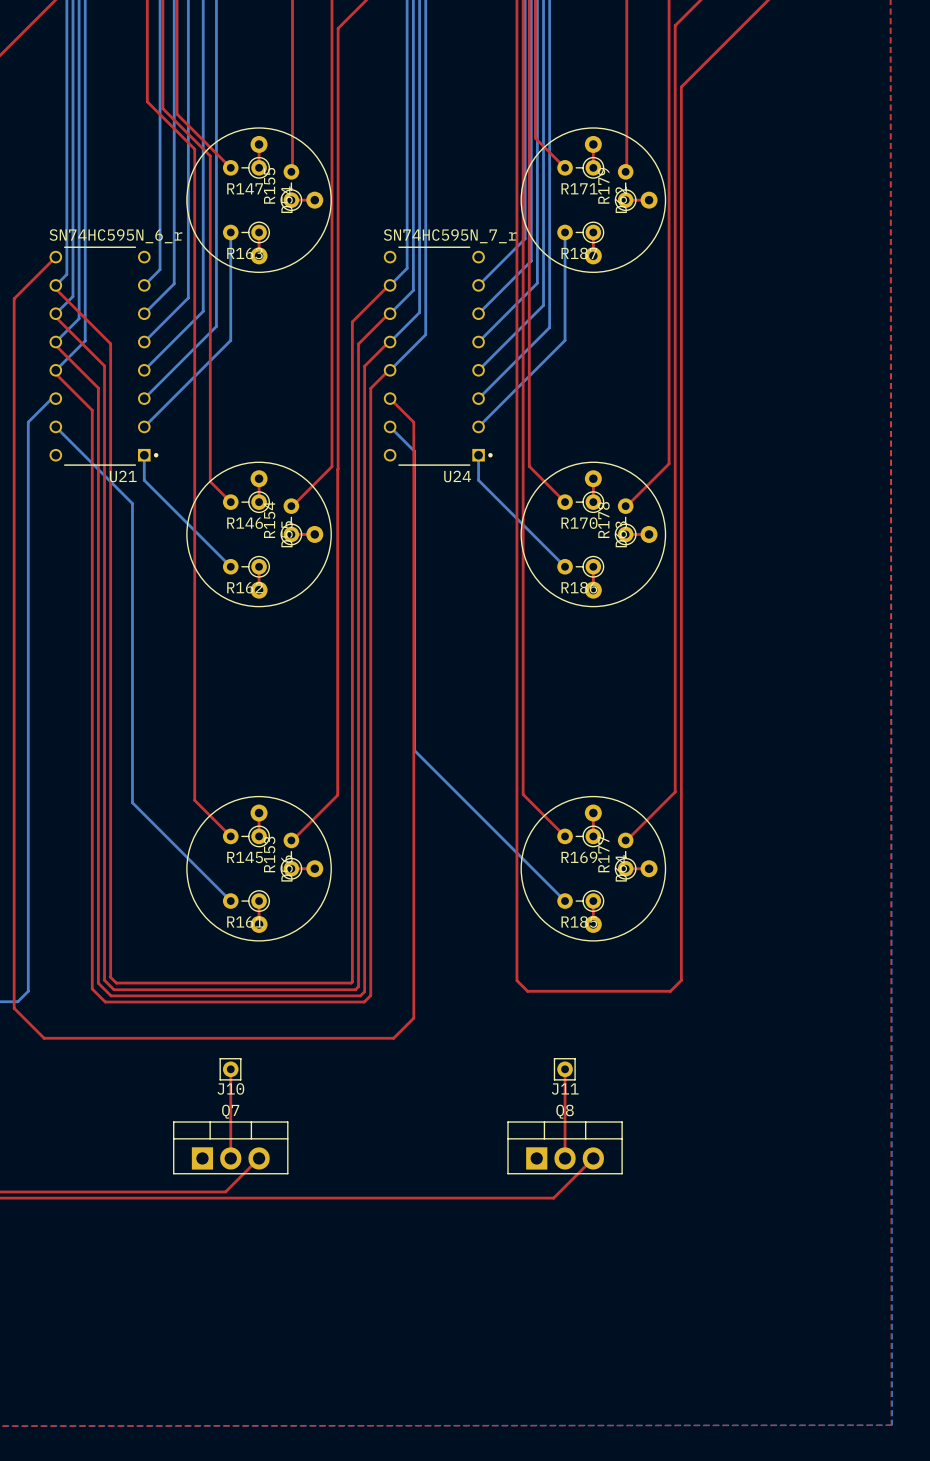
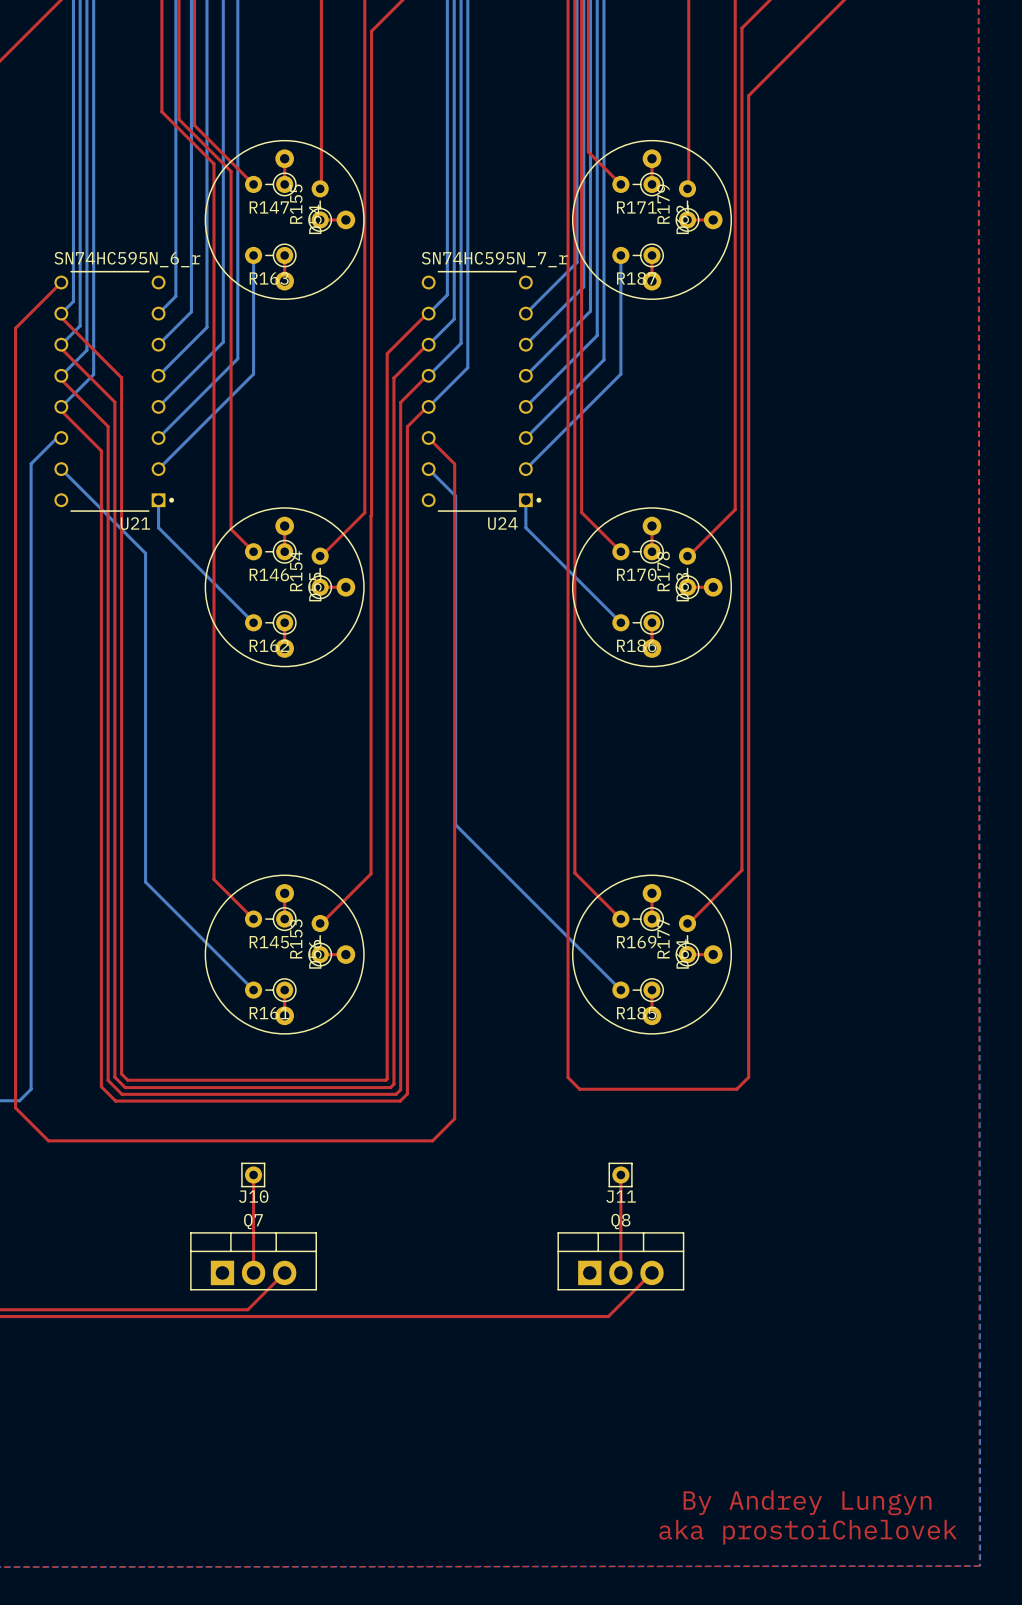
text: none -> By Andrey Lungyn (807, 1502)
text: none -> aka prostoiChelovek (808, 1532)

